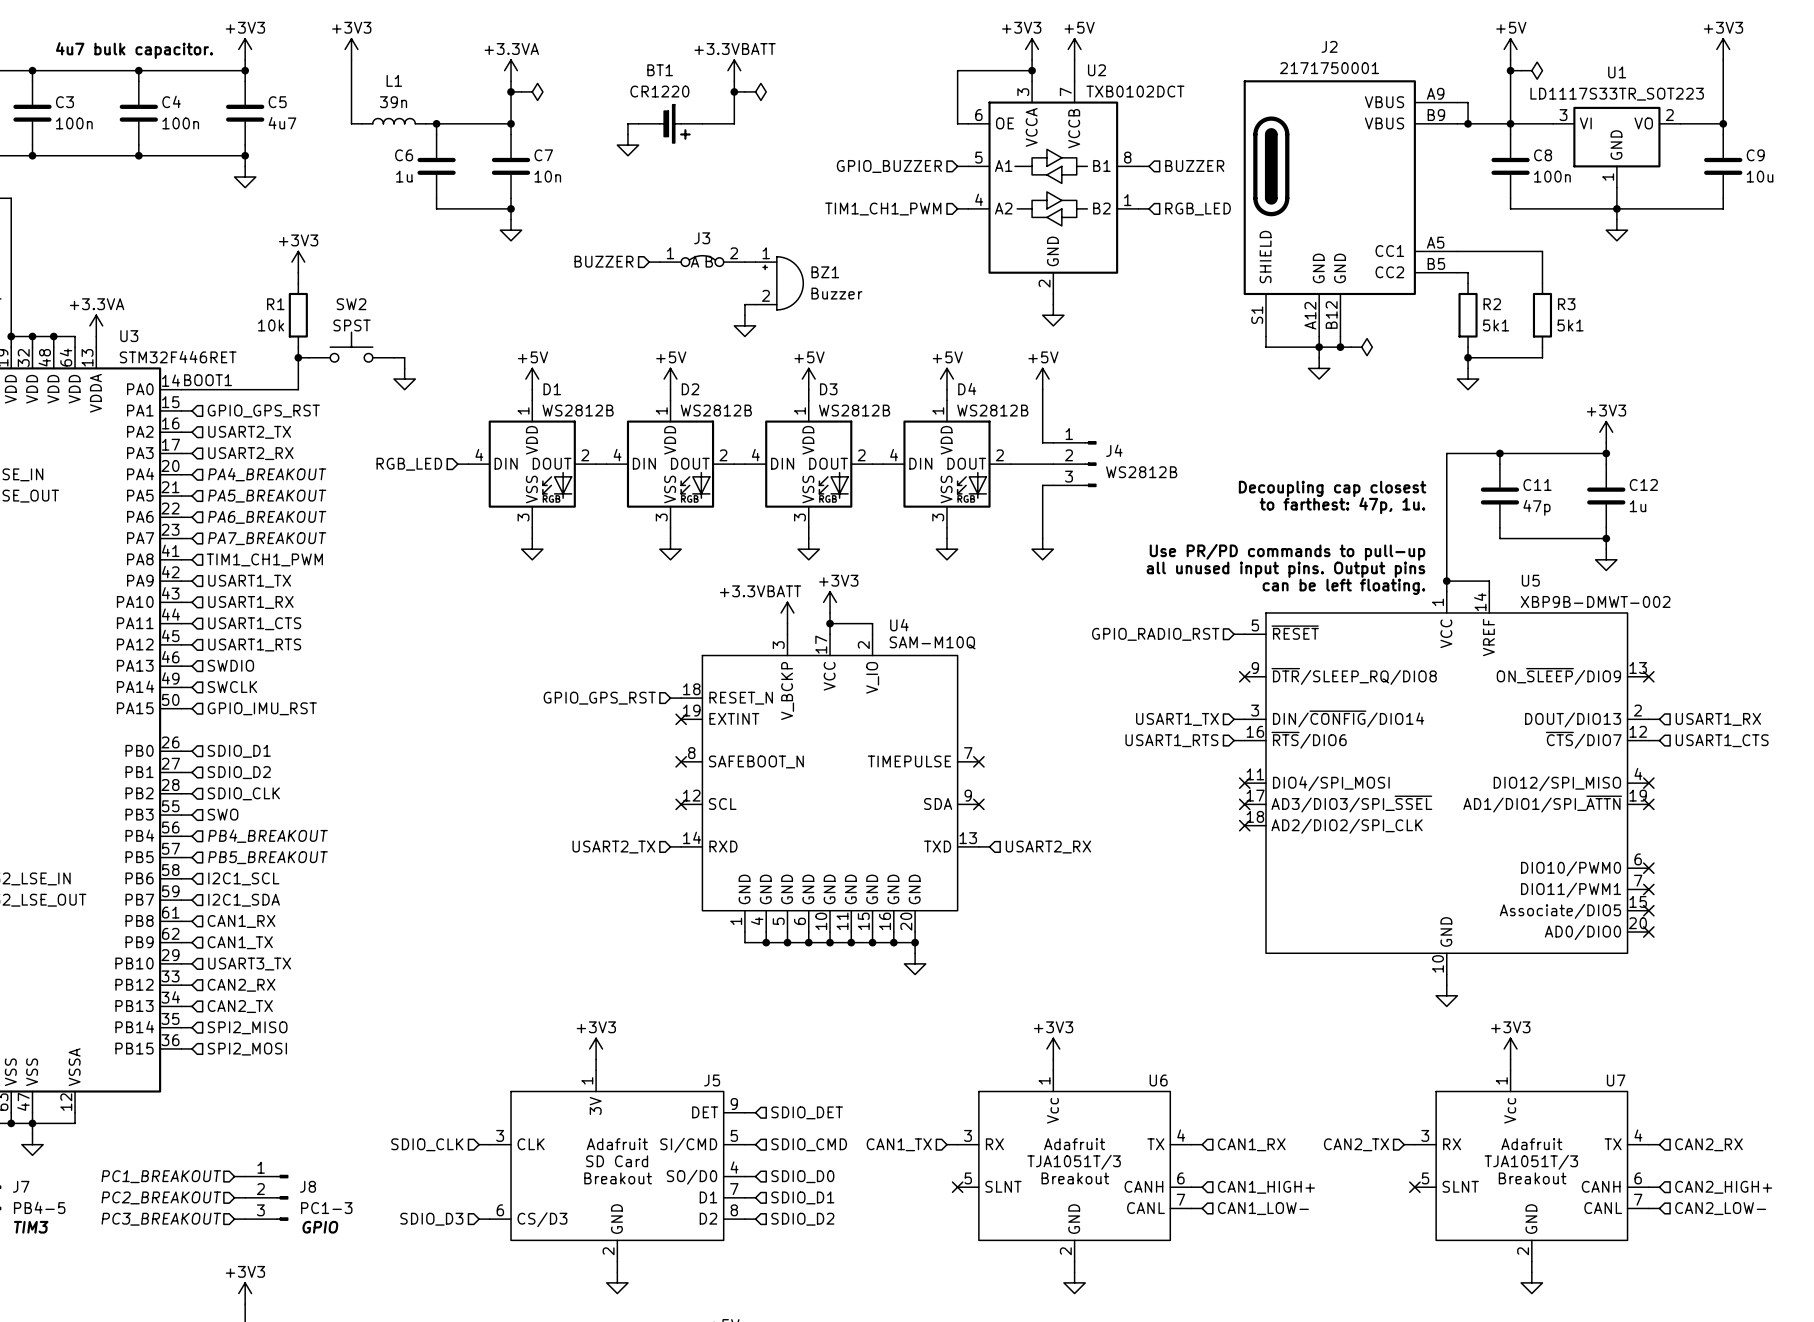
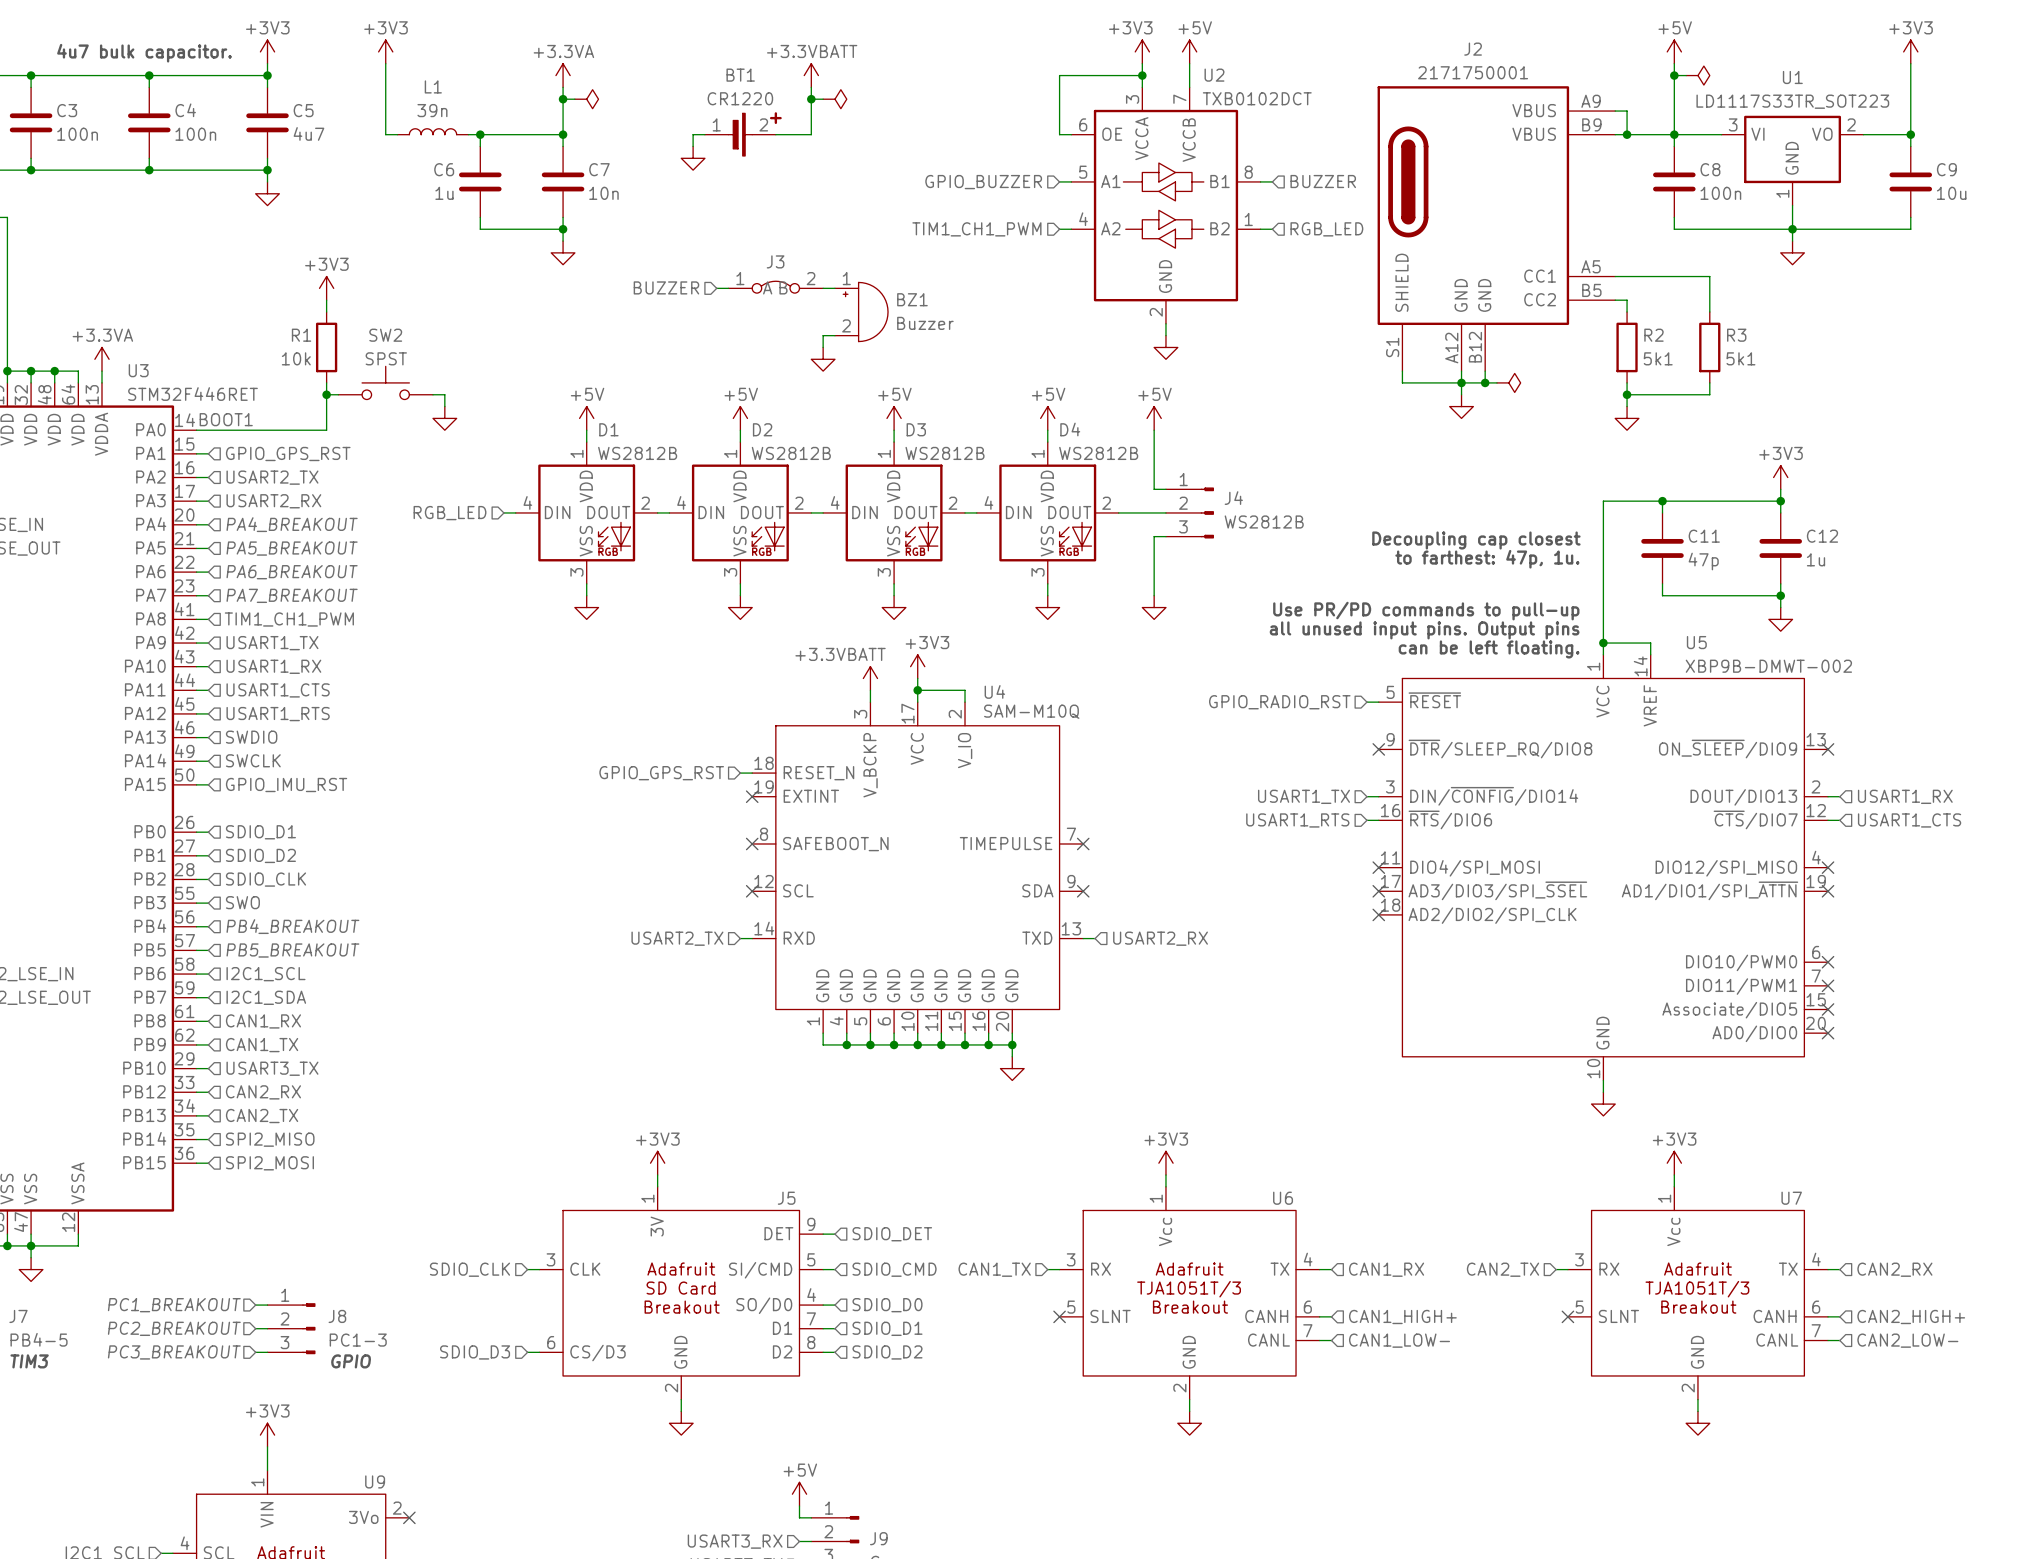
BT1 symbol: [638, 104, 703, 143] -> [704, 112, 782, 156]

